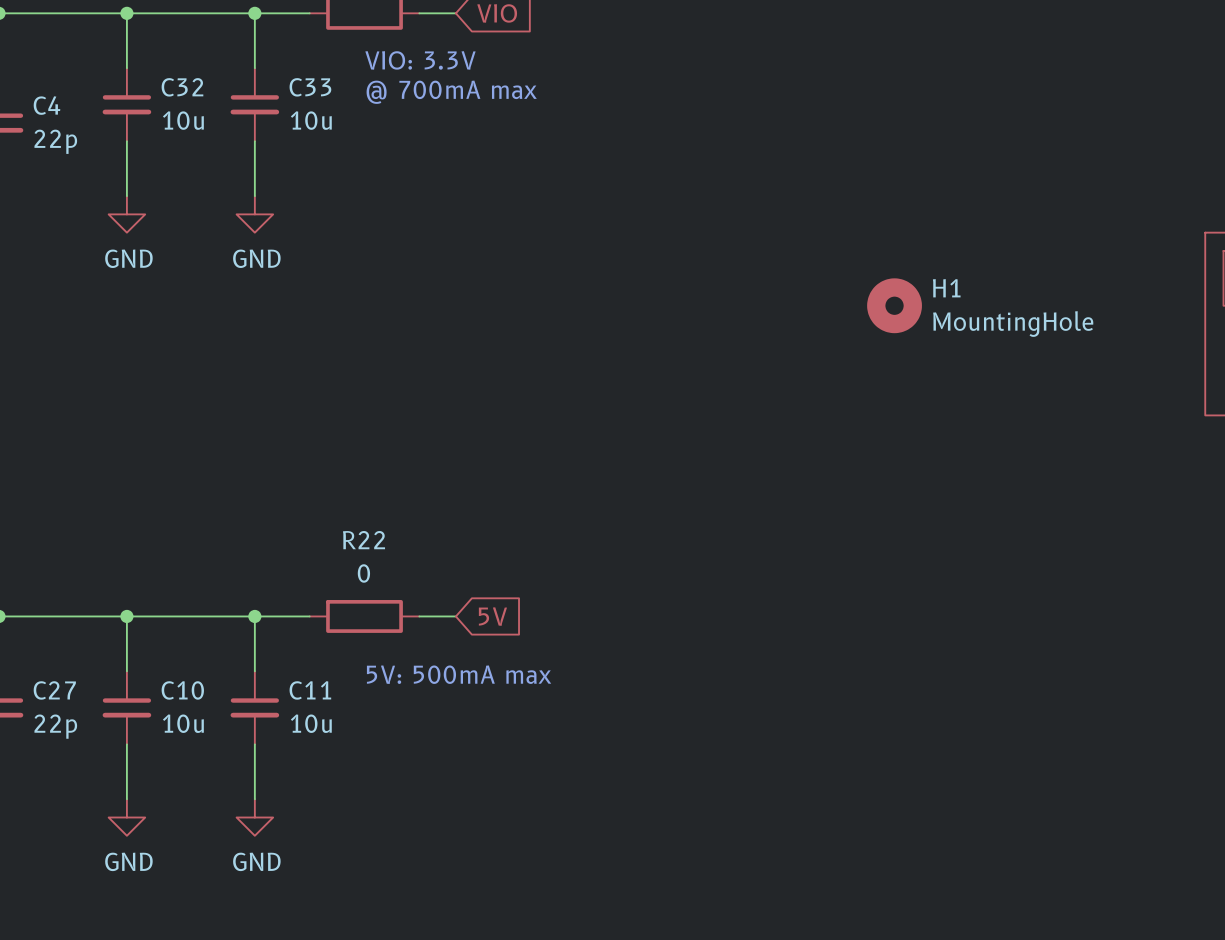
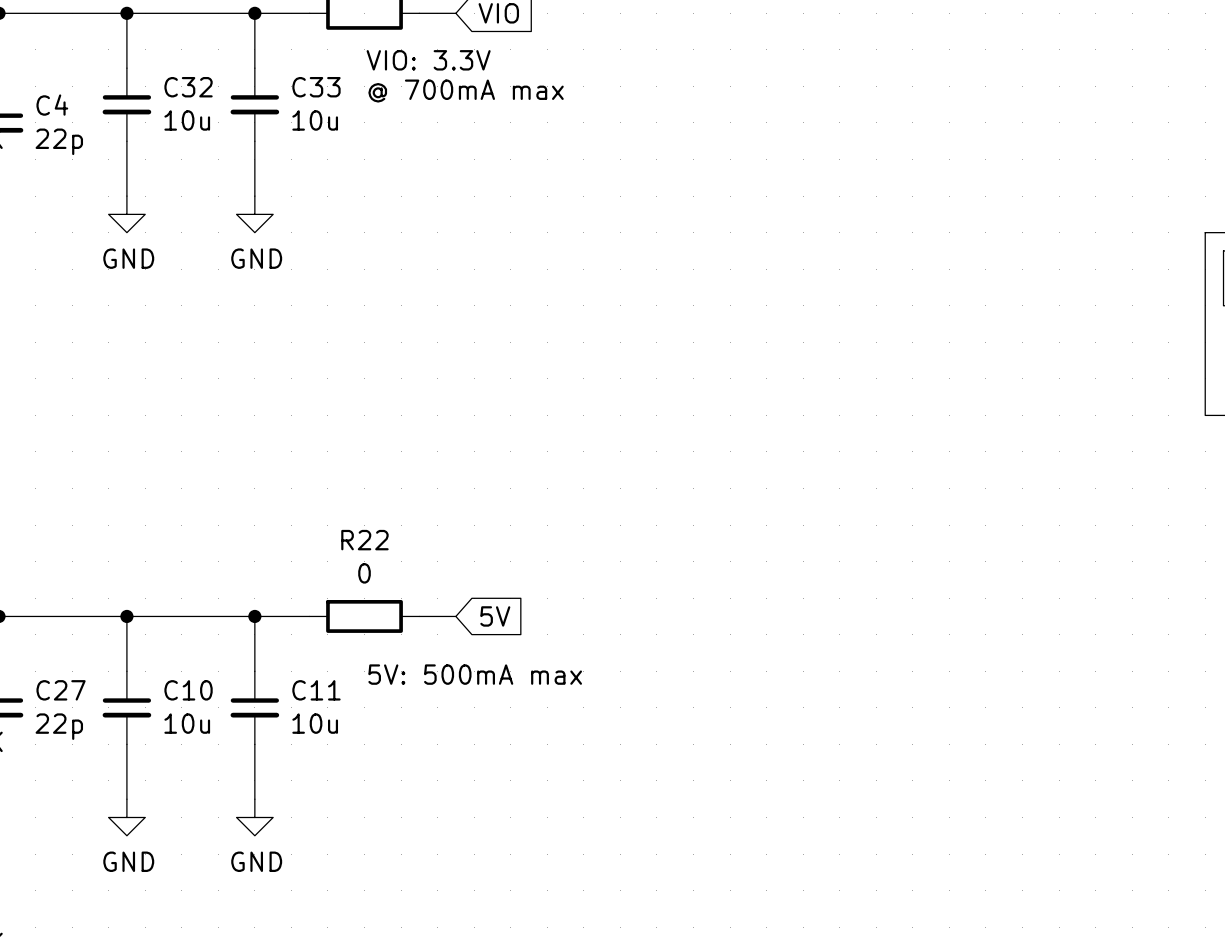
H1: MountingHole (894, 305) -> none

